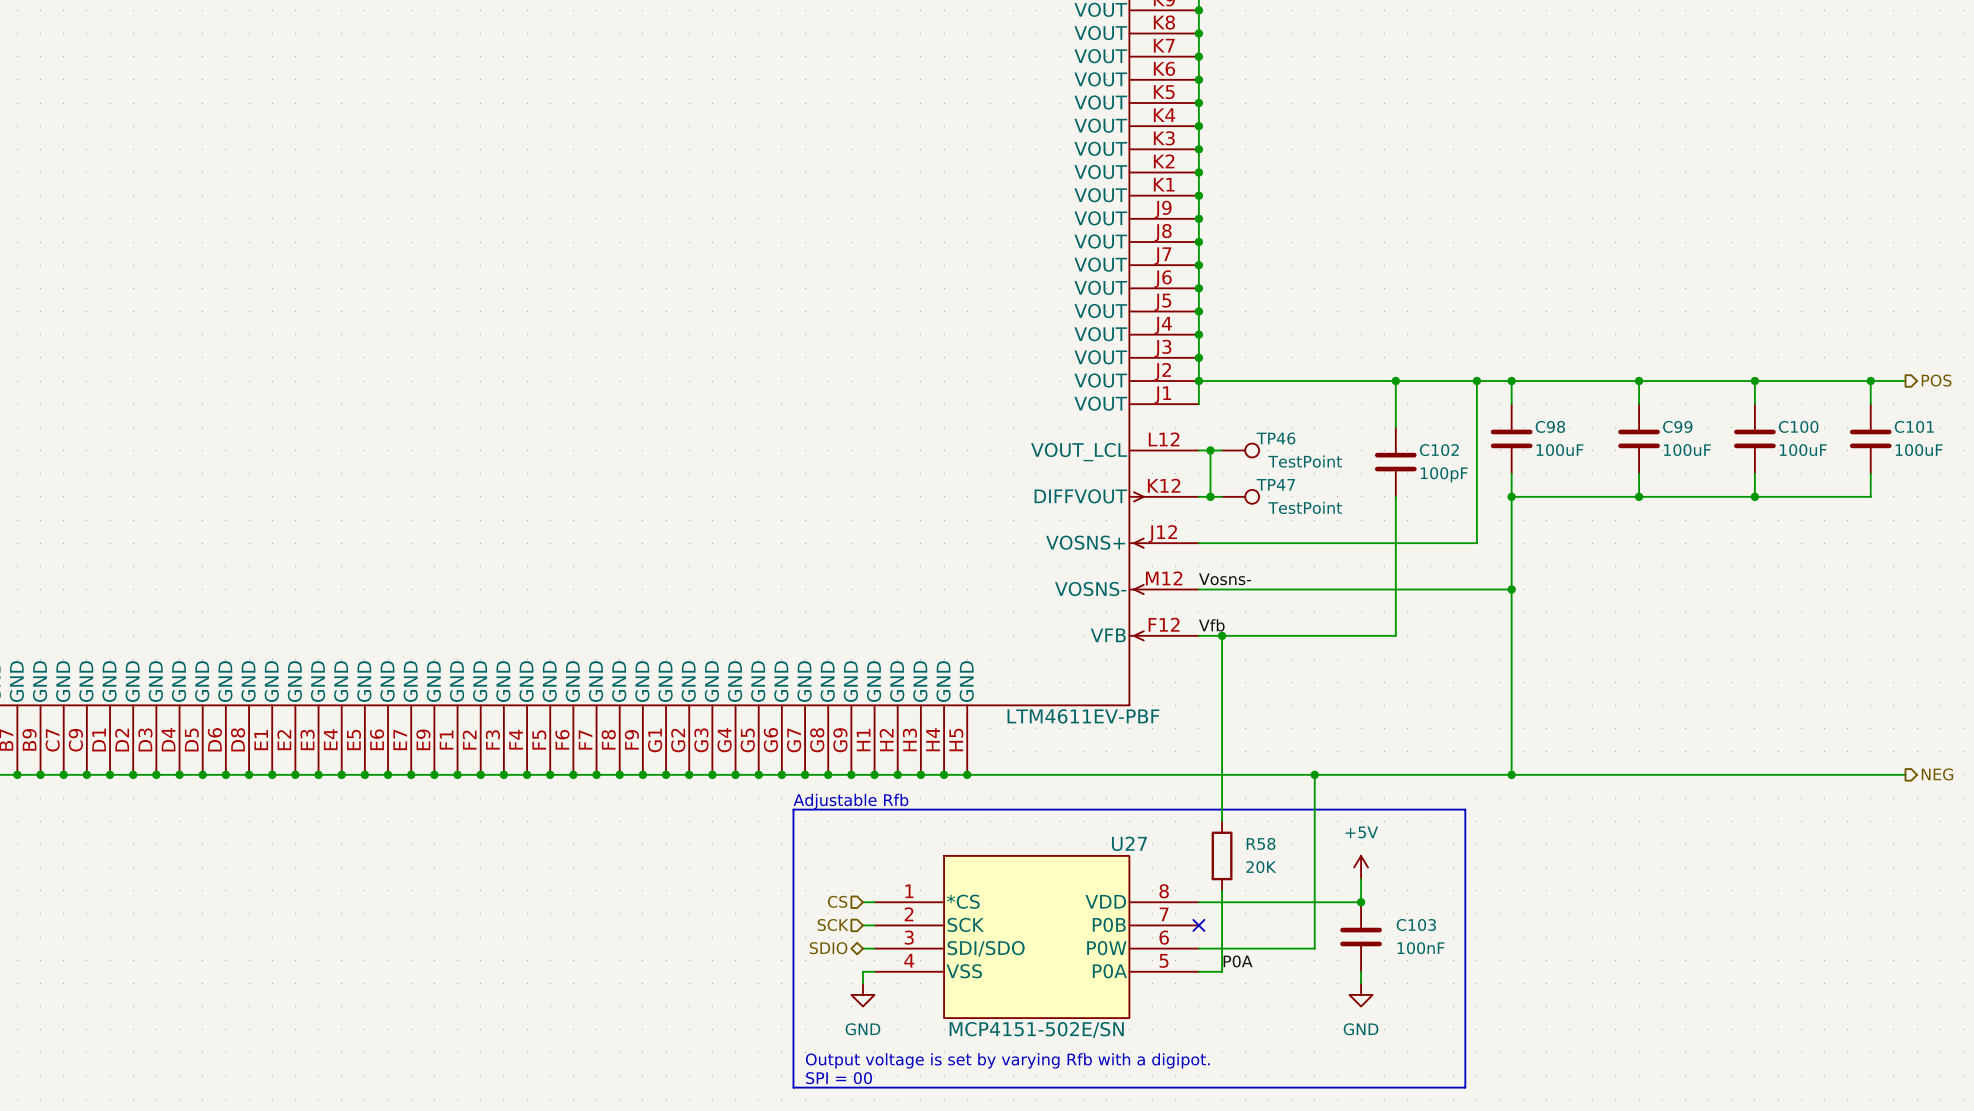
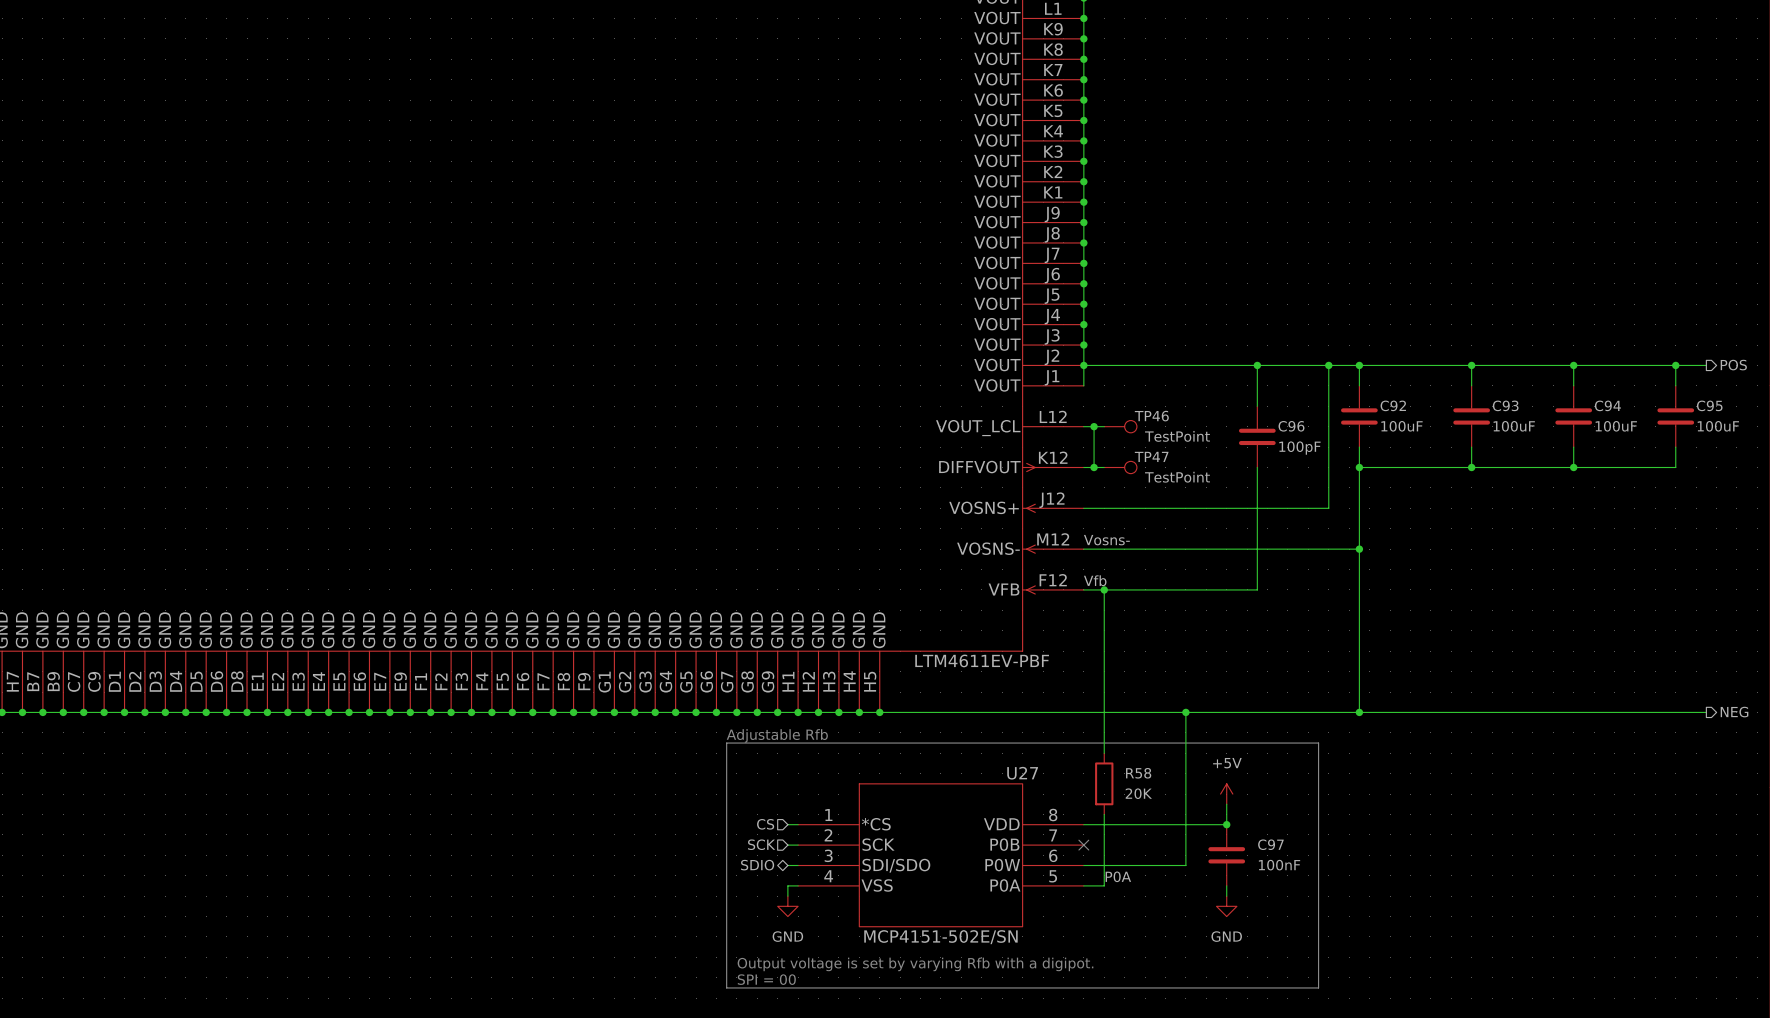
C98 name: C98 (1550, 426) -> C92 (1393, 405)
C99 name: C99 (1677, 426) -> C93 (1505, 405)
C100 name: C100 (1798, 426) -> C94 (1607, 405)
C101 name: C101 (1914, 426) -> C95 (1709, 405)
C102 name: C102 (1439, 450) -> C96 (1291, 426)
C103 name: C103 (1416, 925) -> C97 (1270, 844)

